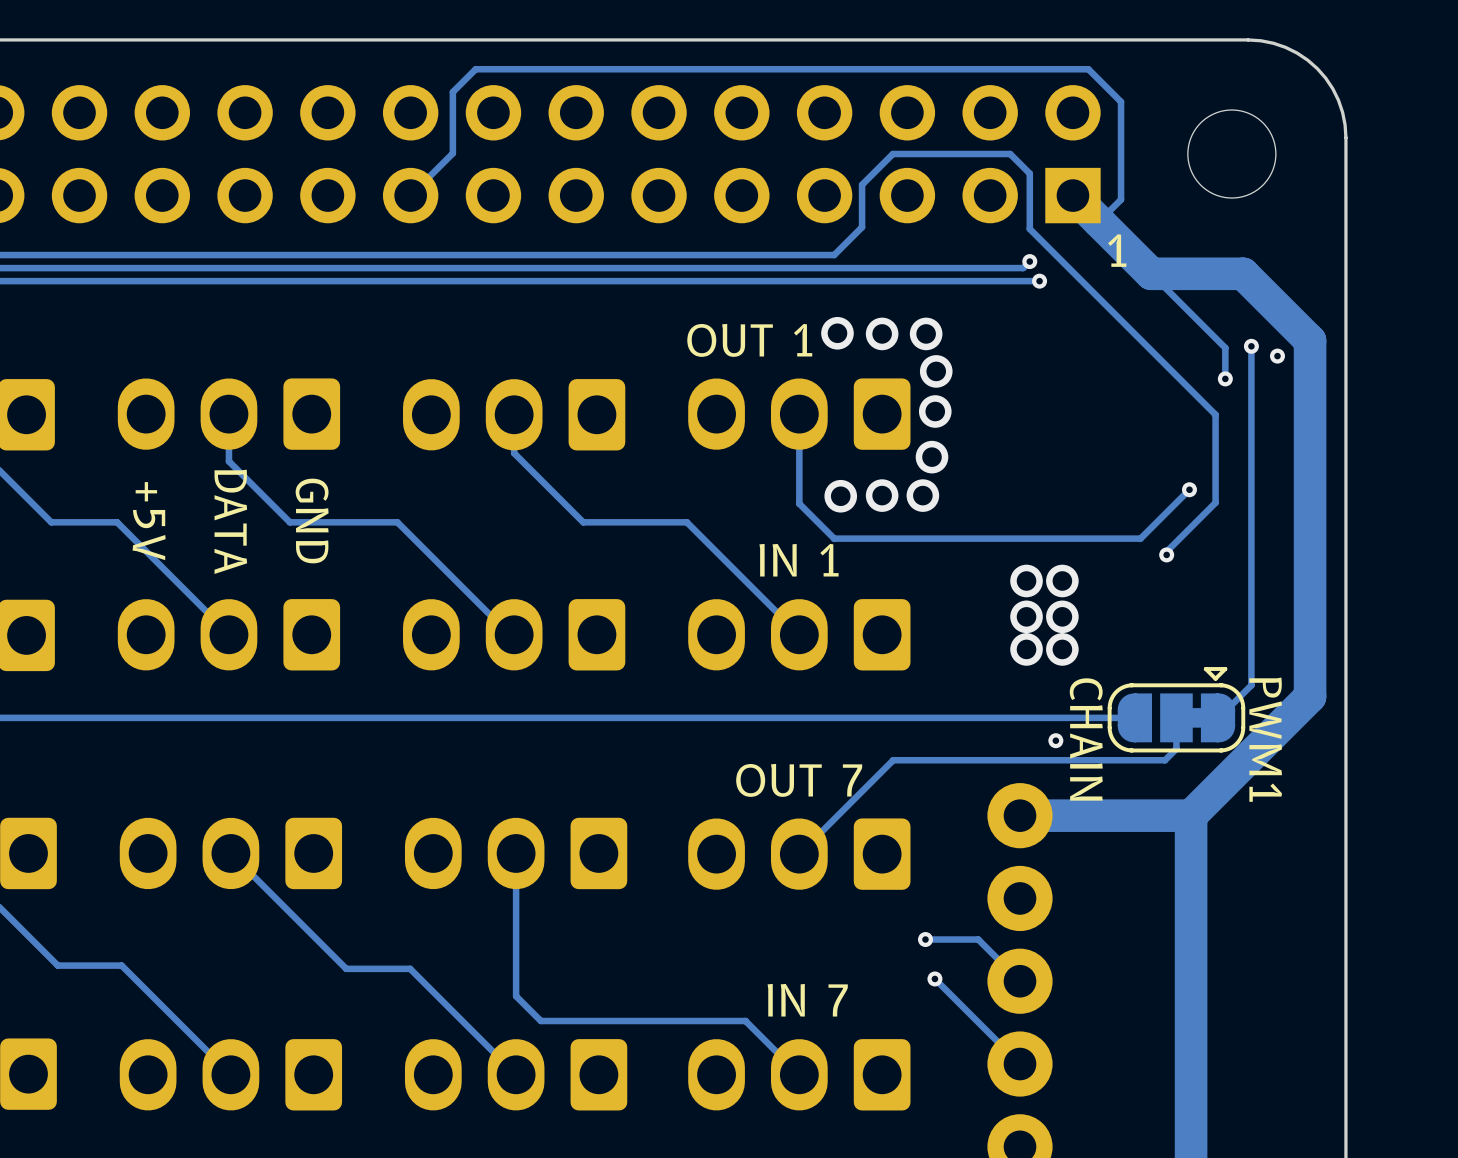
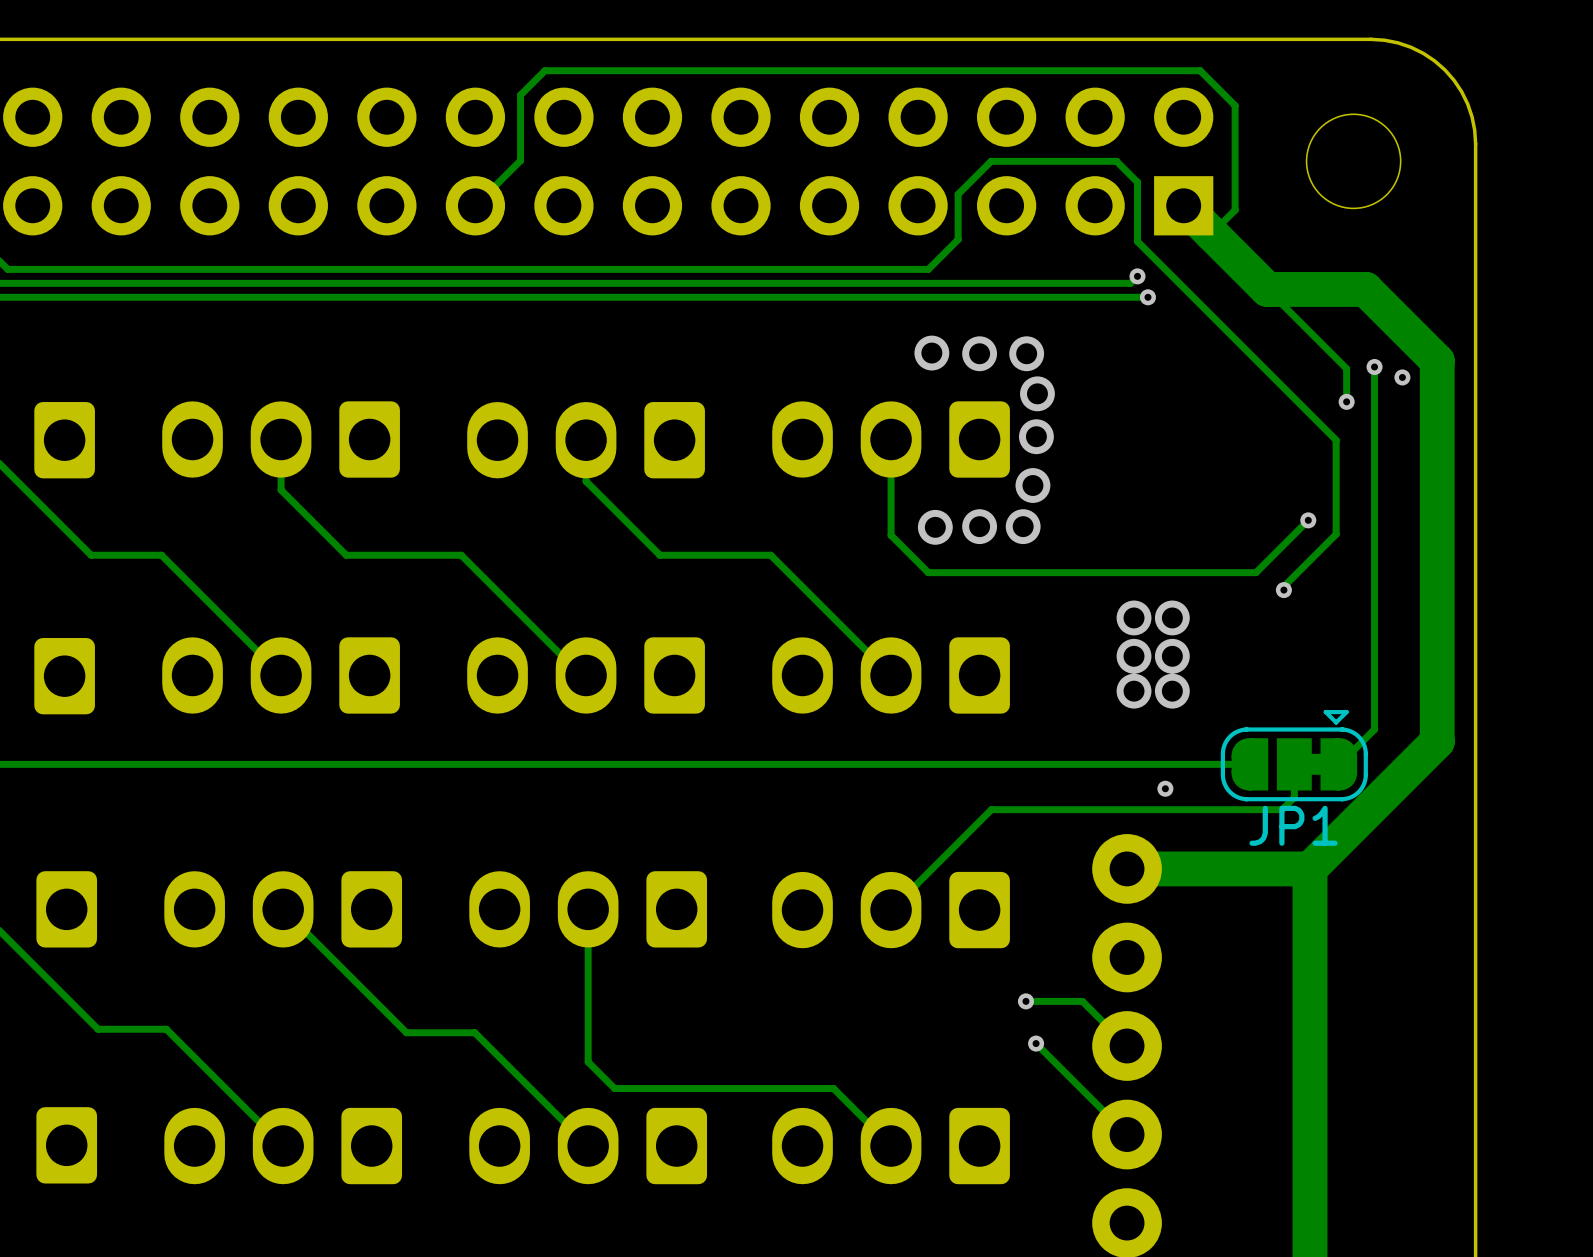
text: 1 (1117, 250) -> none
text: OUT 1 (749, 340) -> none
text: GND (312, 520) -> none
text: +5V (149, 521) -> none
text: DATA (230, 521) -> none
text: IN 1 (799, 560) -> none
text: CHAIN (1086, 739) -> none
text: PWM1 (1265, 739) -> none
JP1 name: none -> JP1 (1293, 825)
text: OUT 7 (799, 780) -> none
text: IN 7 (807, 1000) -> none

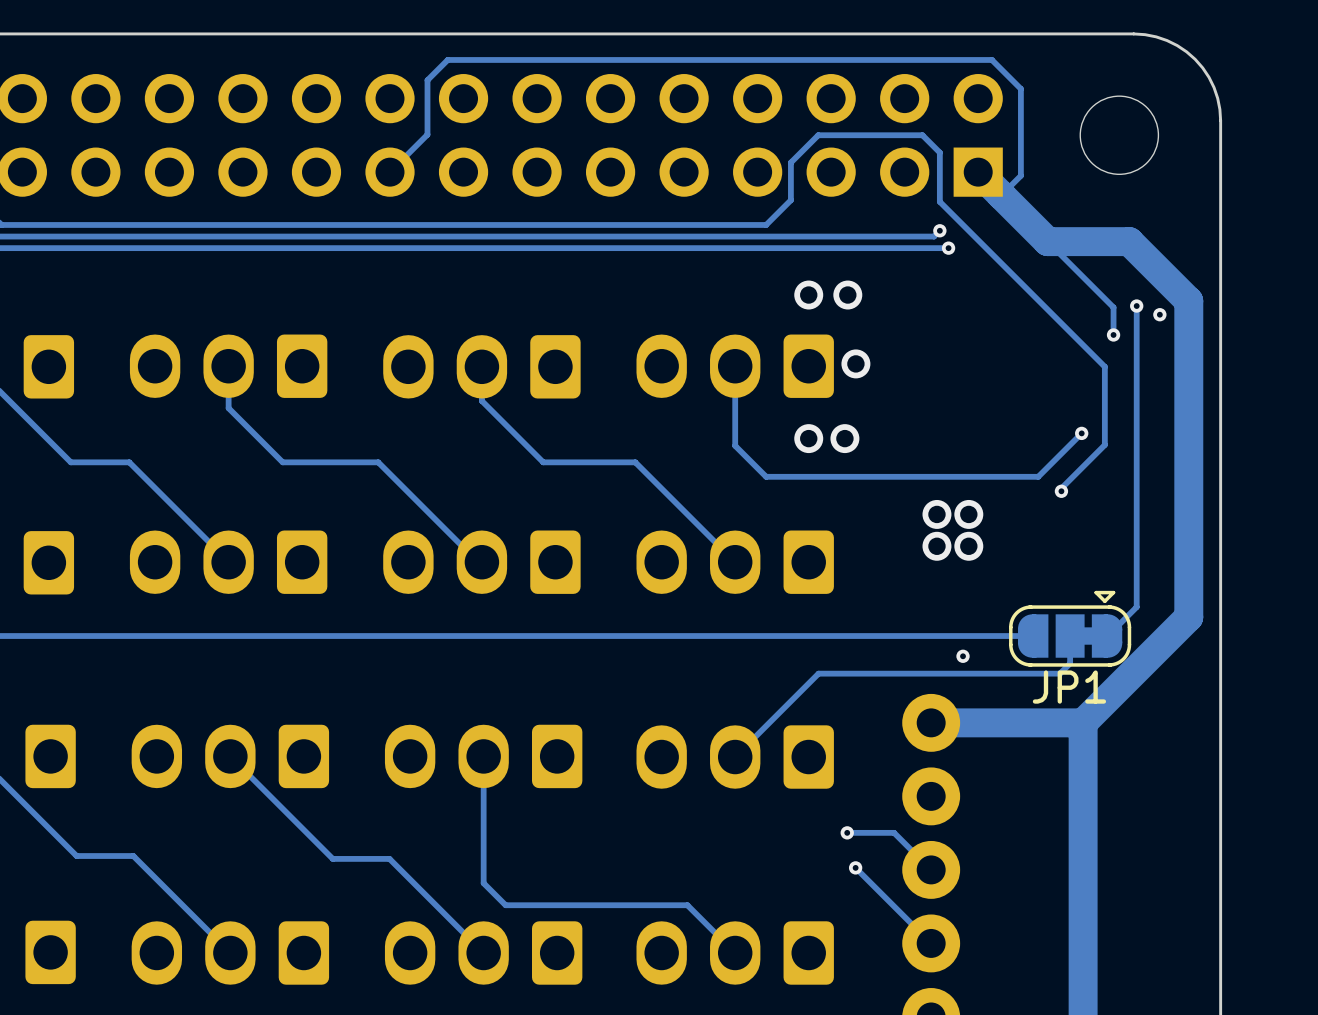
via: (931, 353) -> none
via: (1037, 393) -> none
via: (1032, 485) -> none
via: (935, 527) -> none
via: (1134, 691) -> none
via: (1172, 691) -> none

